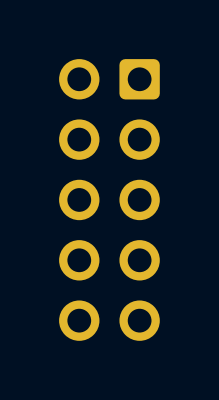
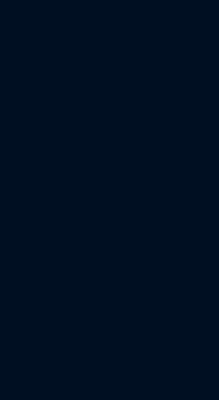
part: (109, 199) -> none

